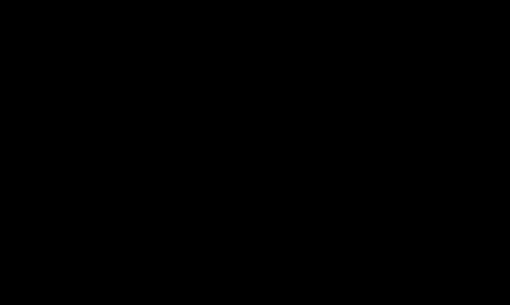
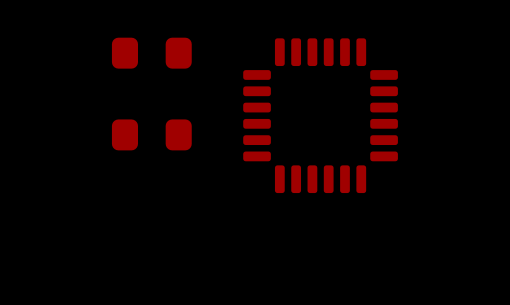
part: none -> (151, 53)
part: none -> (320, 115)
part: none -> (151, 134)

